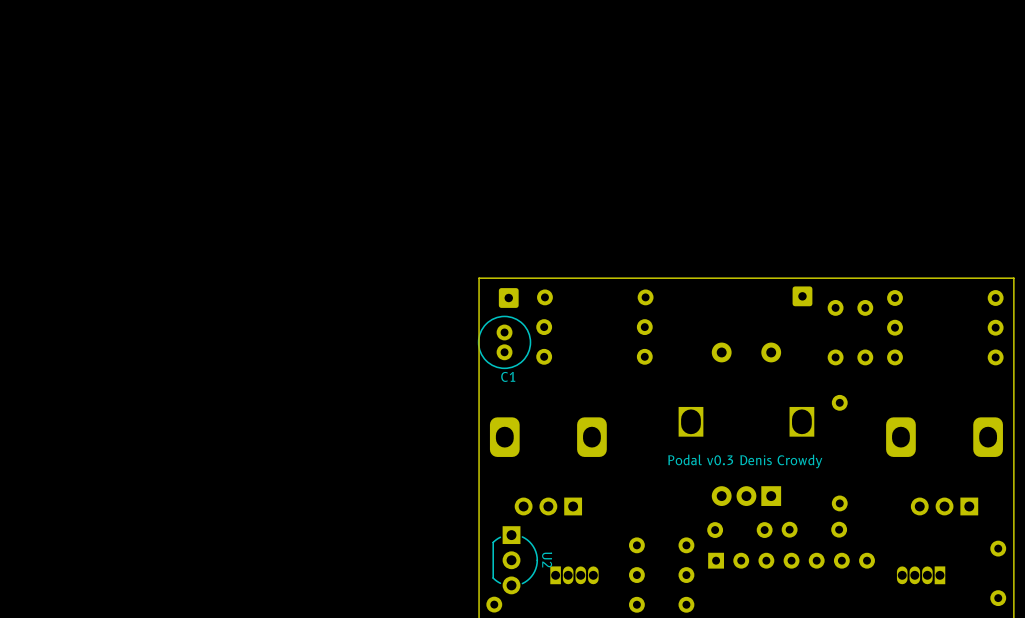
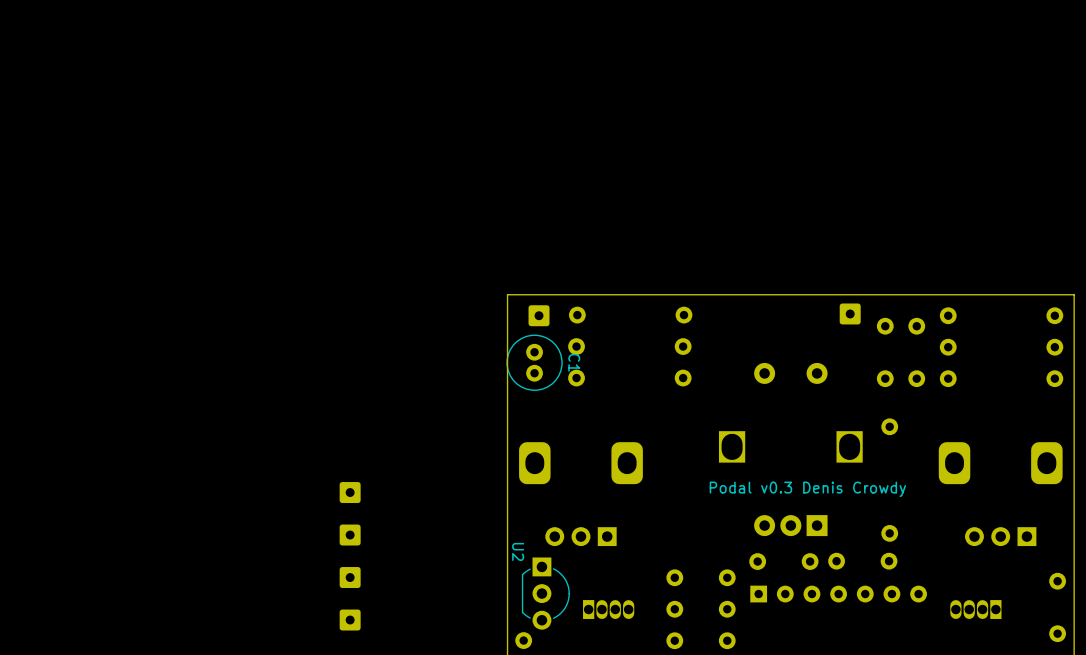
C1 name rotation: 0° (508, 376) -> 90° clockwise (574, 362)
C1 name position: C1 (508, 376) -> C1 (574, 362)
part: none -> (350, 492)
part: none -> (350, 535)
part: none -> (350, 577)
U2 name position: U2 (547, 559) -> U2 (518, 551)
part: none -> (350, 620)

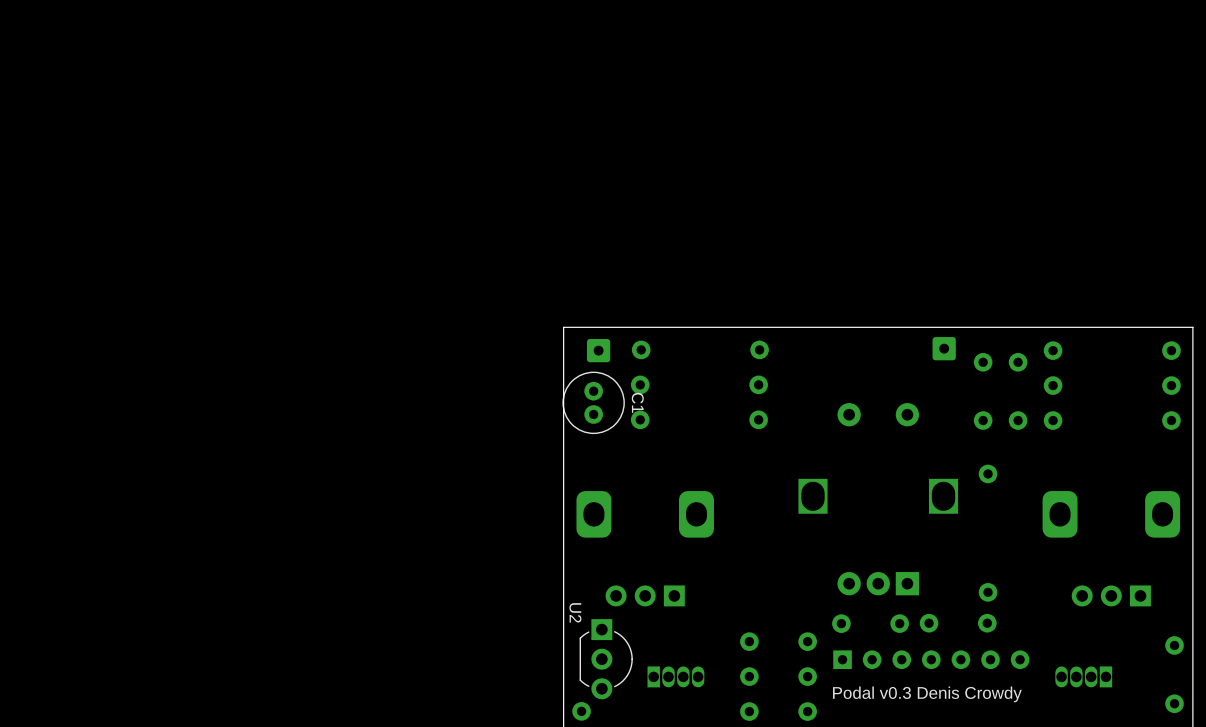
text position: Podal v0.3 Denis Crowdy (807, 489) -> Podal v0.3 Denis Crowdy (927, 694)
part: (350, 492) -> none
part: (350, 535) -> none
part: (350, 577) -> none
part: (350, 620) -> none

